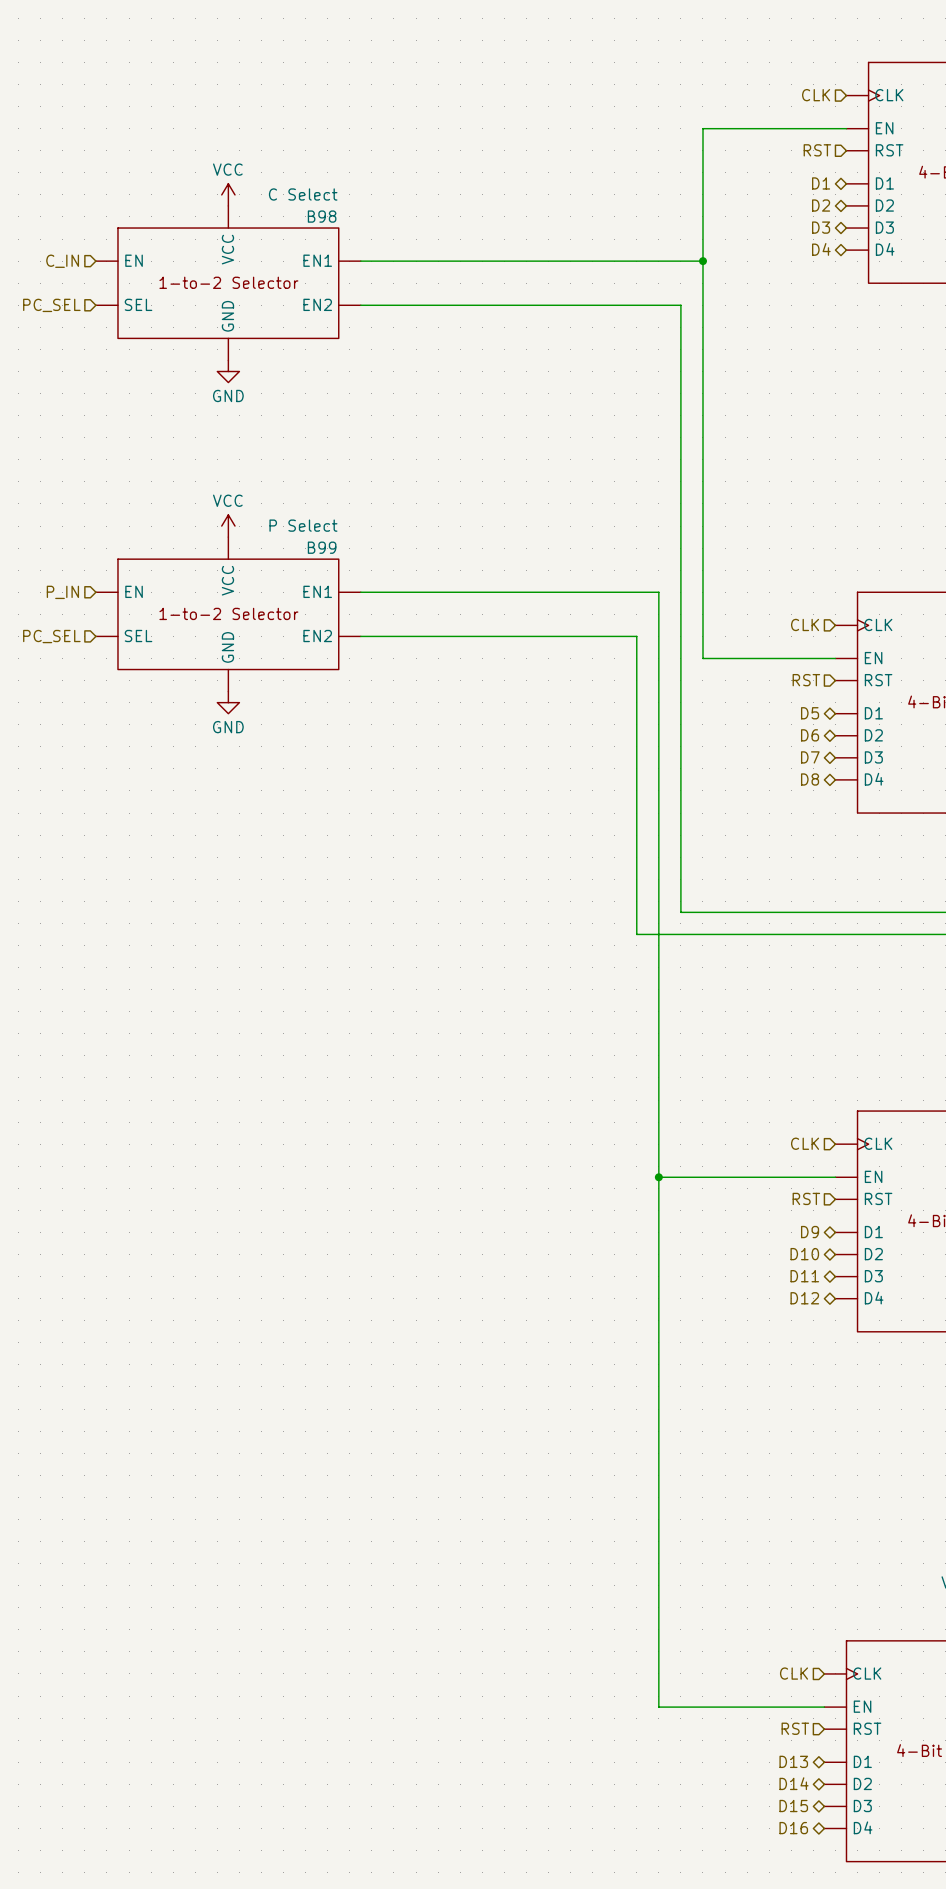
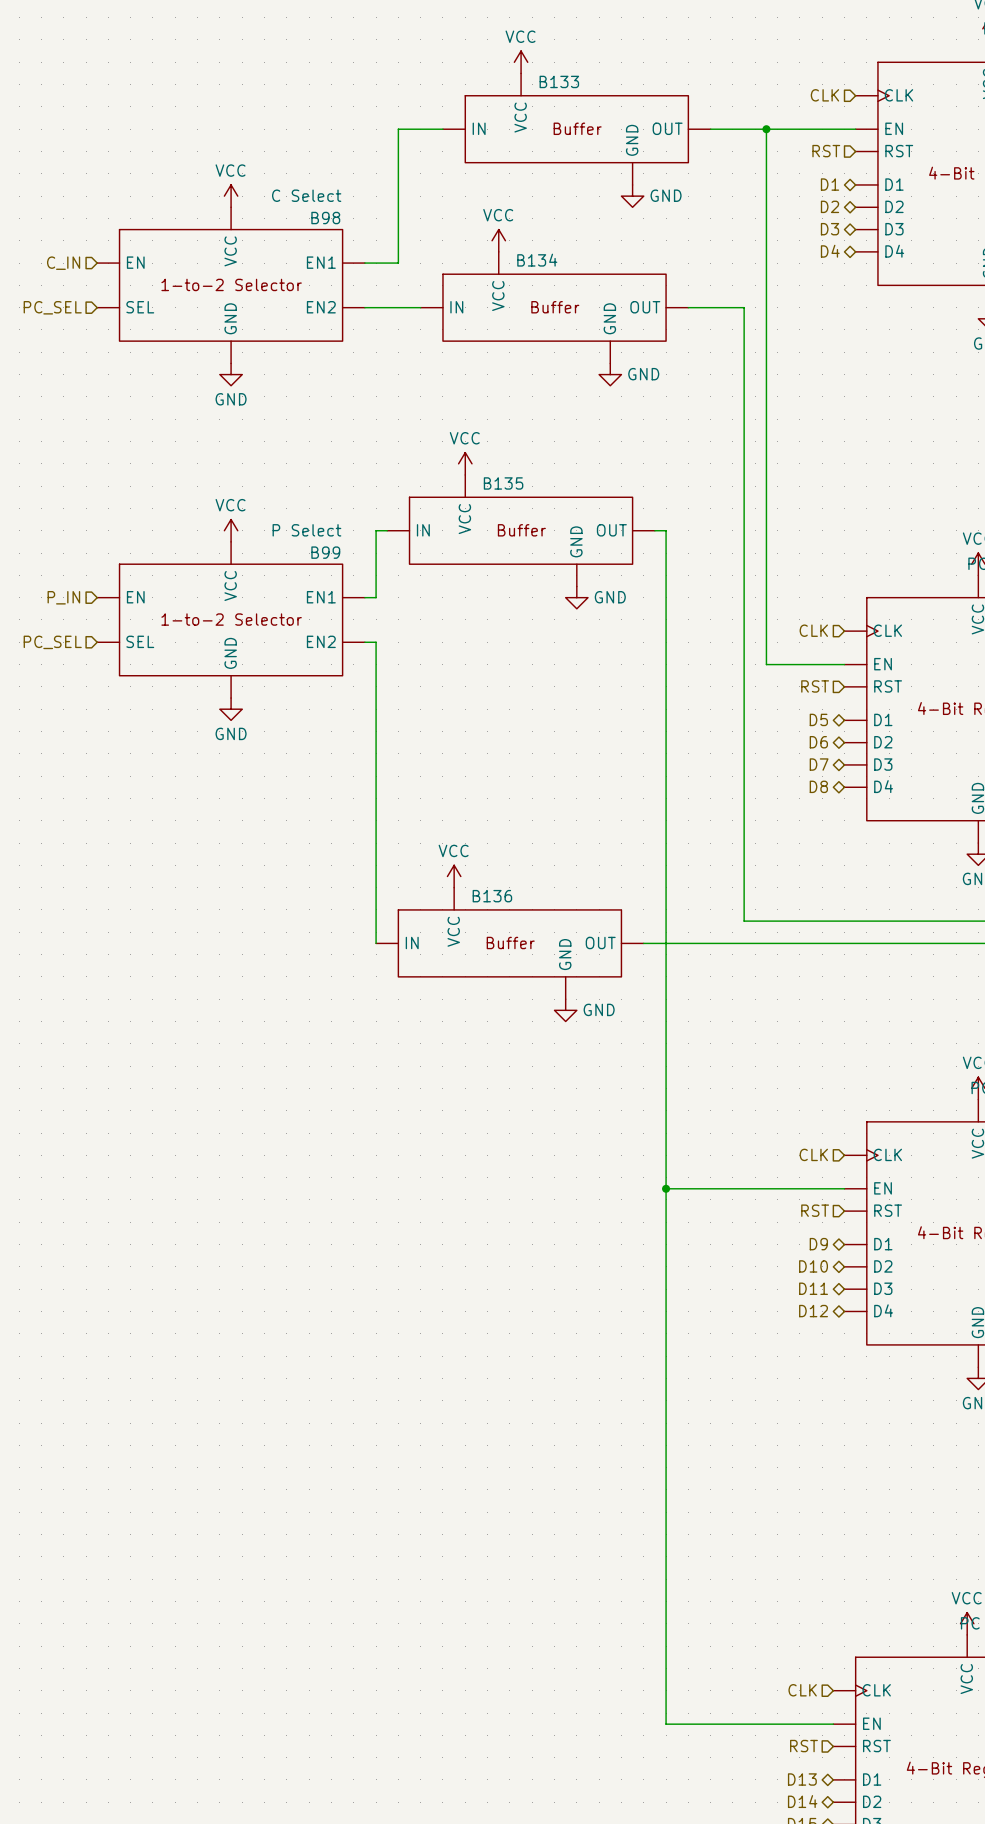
power symbol: none -> VCC (521, 62)
B133: none -> (576, 129)
wire: (702, 128) (702, 658) (758, 658) -> (766, 129) (766, 664)
junction: none -> (766, 129)
power symbol: none -> GND (632, 196)
power symbol: none -> VCC (498, 240)
wire: (393, 261) (702, 261) -> (398, 263) (398, 129) (442, 129)
junction: (702, 261) -> none
wire: (416, 305) (680, 305) (680, 912) (736, 912) -> (688, 307) (744, 307) (744, 921)
B134: none -> (554, 307)
power symbol: none -> GND (610, 374)
power symbol: none -> VCC (465, 463)
B135: none -> (521, 530)
wire: none -> (654, 530) (666, 530) (666, 597)
wire: (371, 592) (658, 592) -> (376, 597) (376, 530) (387, 530)
power symbol: none -> GND (576, 597)
wire: (371, 636) (636, 636) (636, 934) -> (376, 642) (376, 943)
power symbol: none -> VCC (454, 876)
B136: none -> (509, 943)
power symbol: none -> GND (565, 1010)

